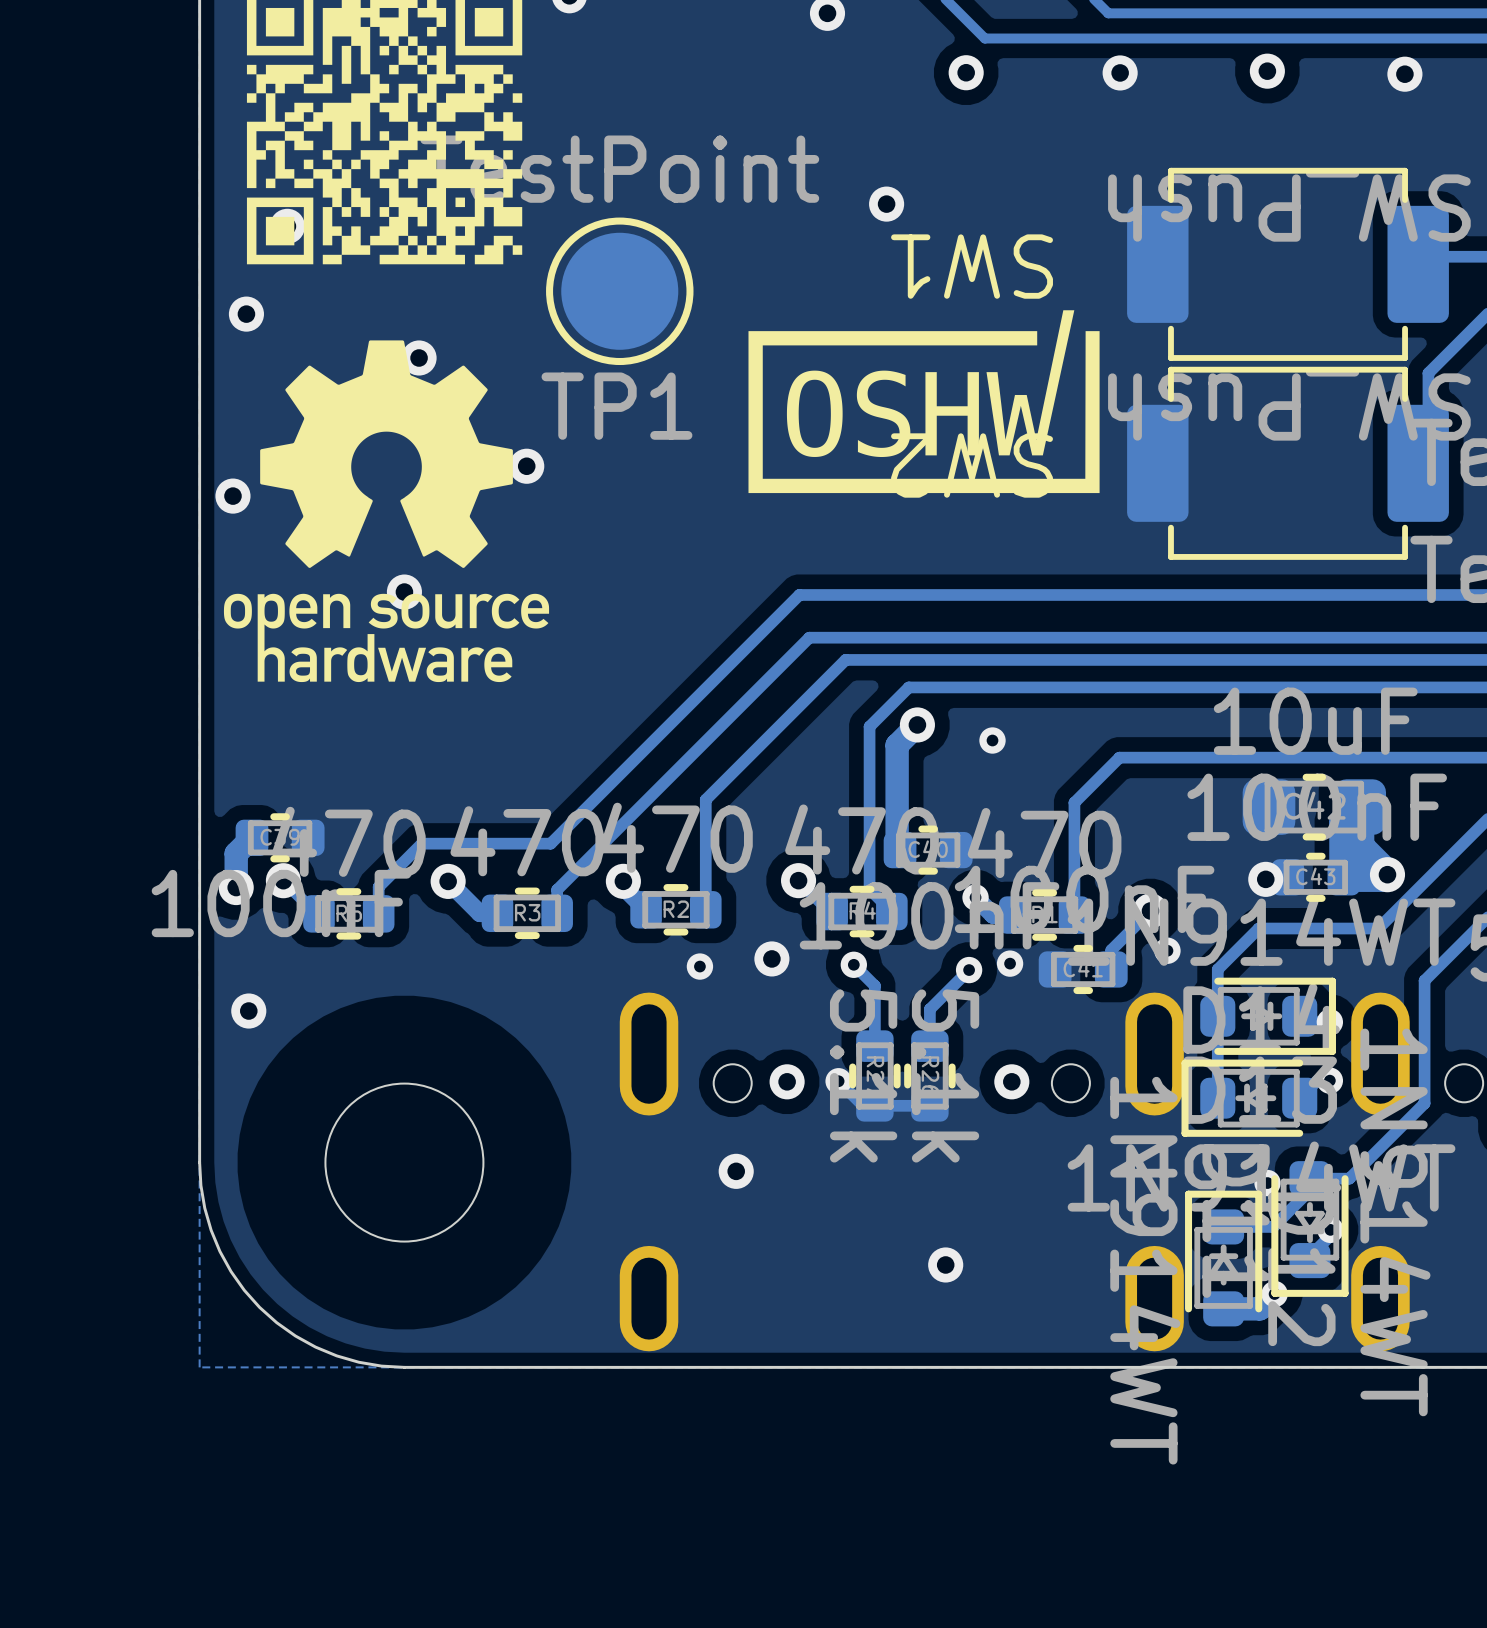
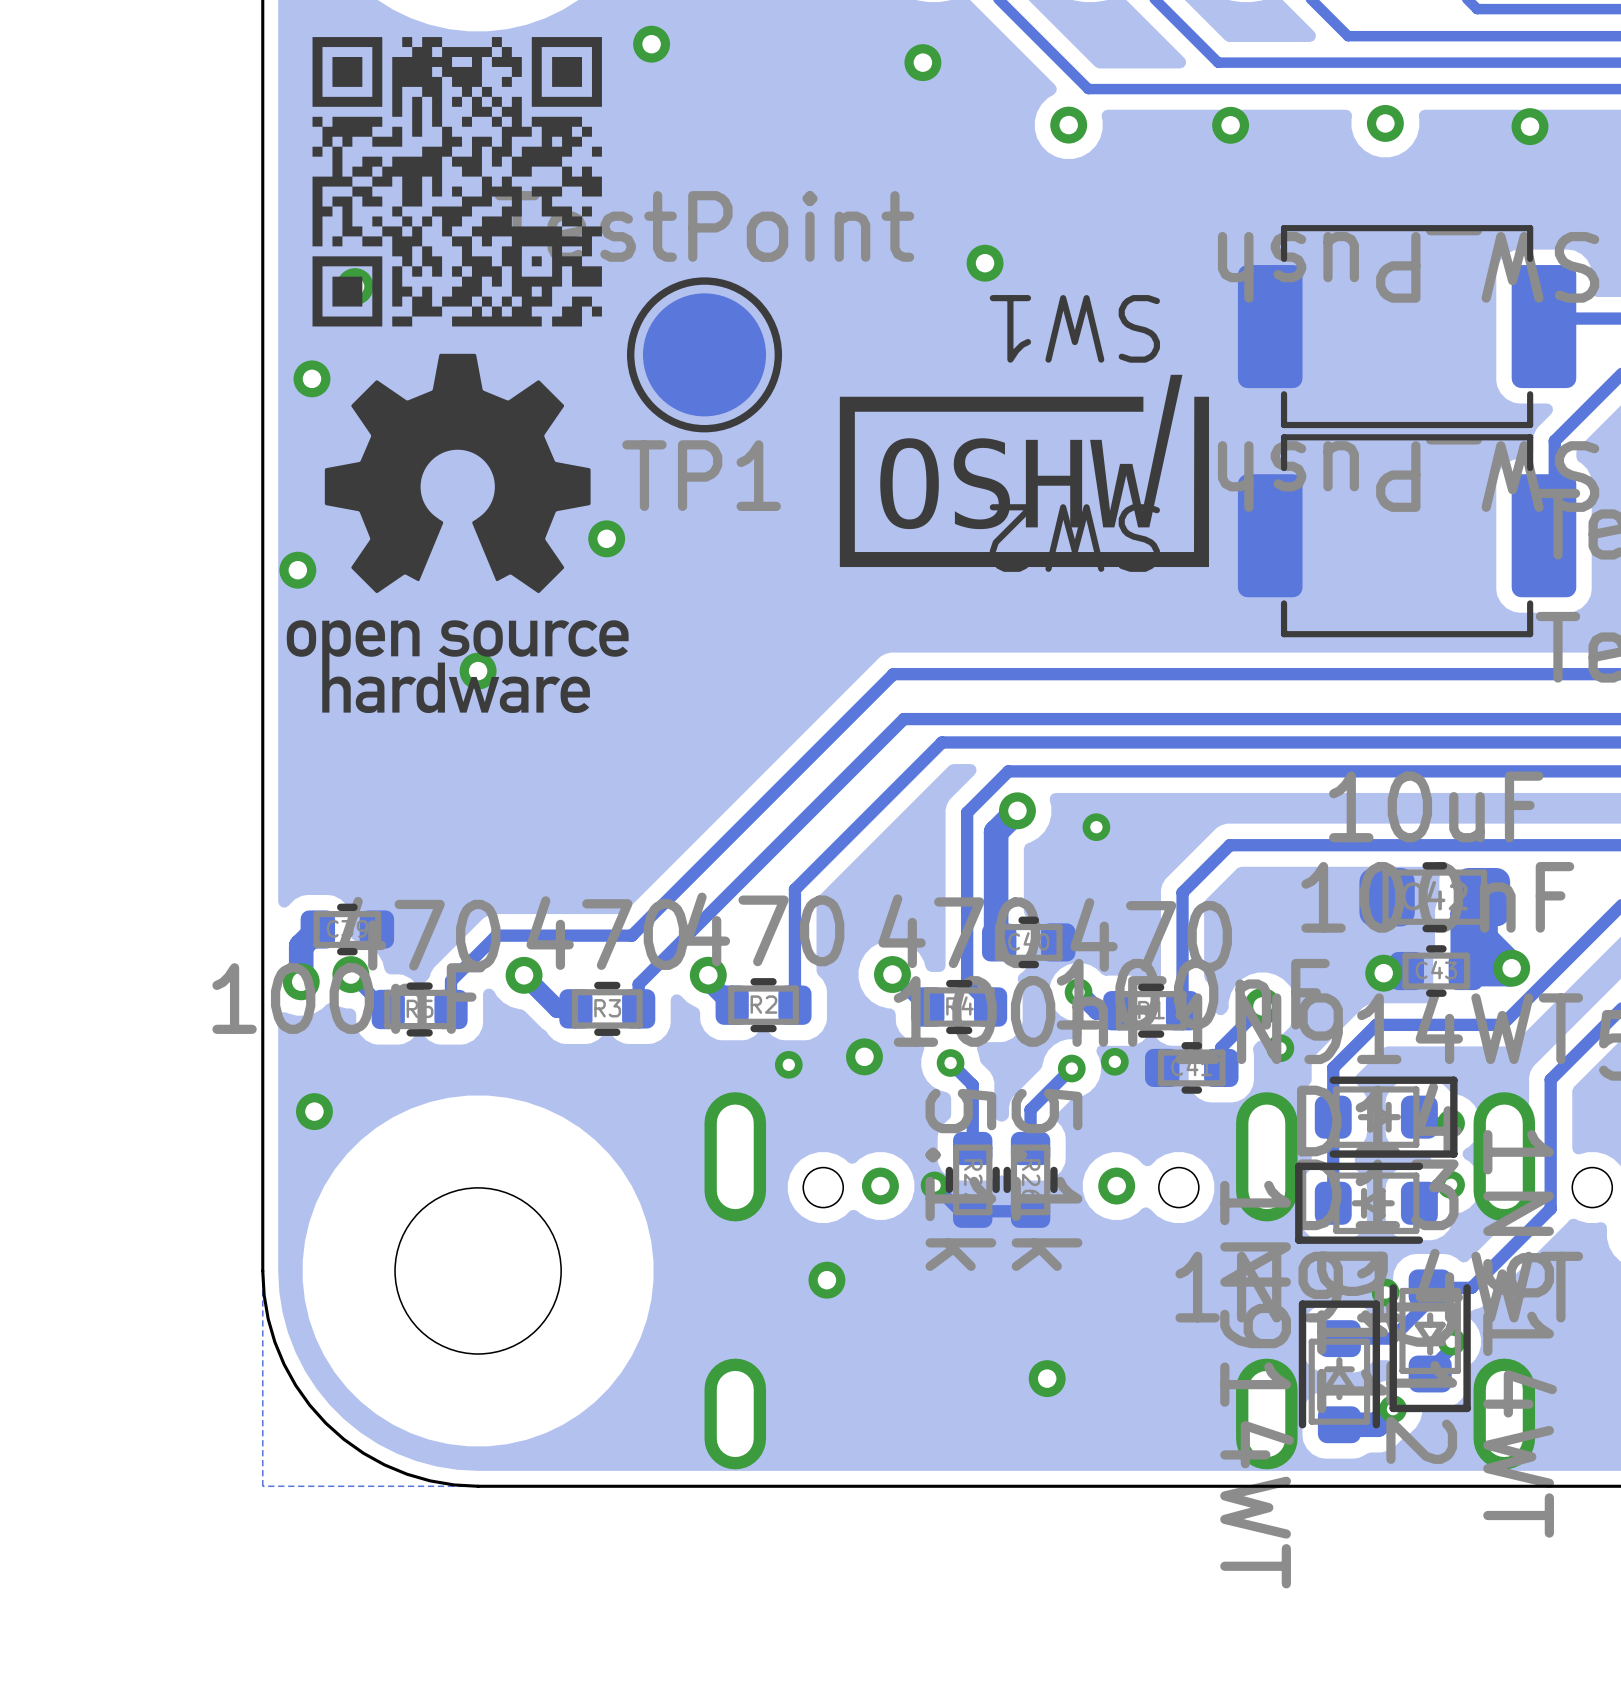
drawing shape: [260, 340, 513, 568] -> [324, 353, 591, 594]
drawing position: (336, 610) -> (405, 638)
drawing position: (481, 610) -> (557, 638)
drawing position: (237, 611) -> (301, 638)
drawing position: (303, 611) -> (370, 638)
drawing position: (383, 611) -> (454, 638)
drawing position: (415, 611) -> (488, 638)
drawing position: (448, 611) -> (523, 638)
drawing position: (505, 611) -> (582, 638)
drawing position: (535, 611) -> (613, 638)
drawing position: (271, 637) -> (336, 666)
drawing position: (360, 658) -> (430, 687)
drawing position: (303, 664) -> (370, 694)
drawing position: (335, 664) -> (404, 694)
drawing position: (402, 664) -> (474, 694)
drawing position: (440, 664) -> (514, 694)
drawing position: (472, 664) -> (548, 694)
drawing position: (498, 664) -> (575, 694)

